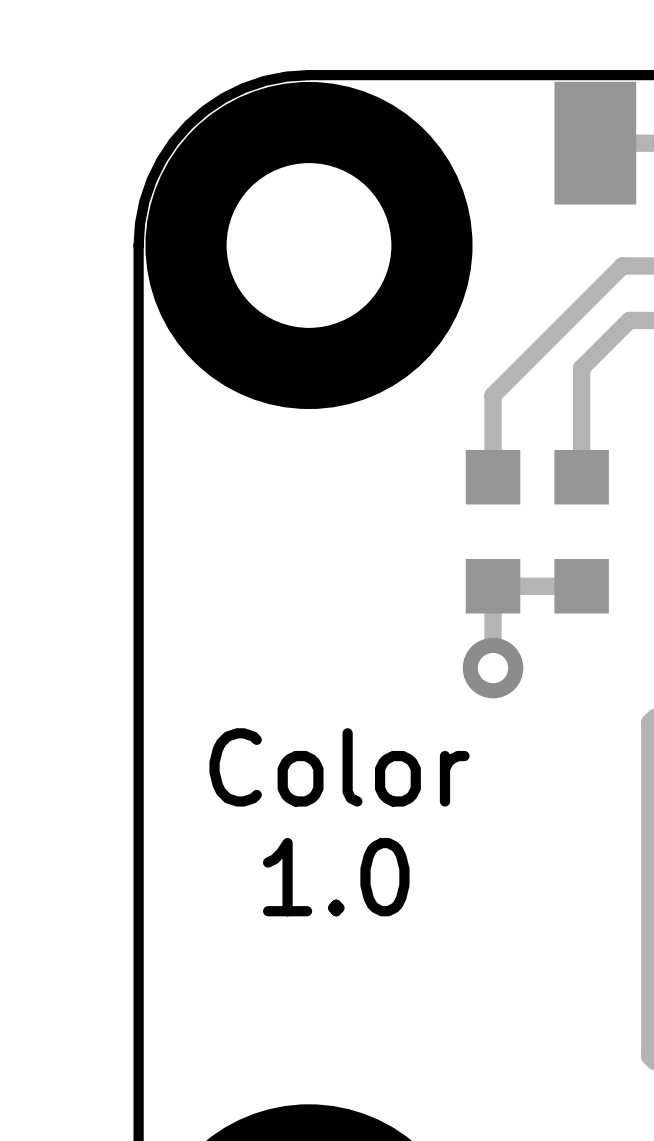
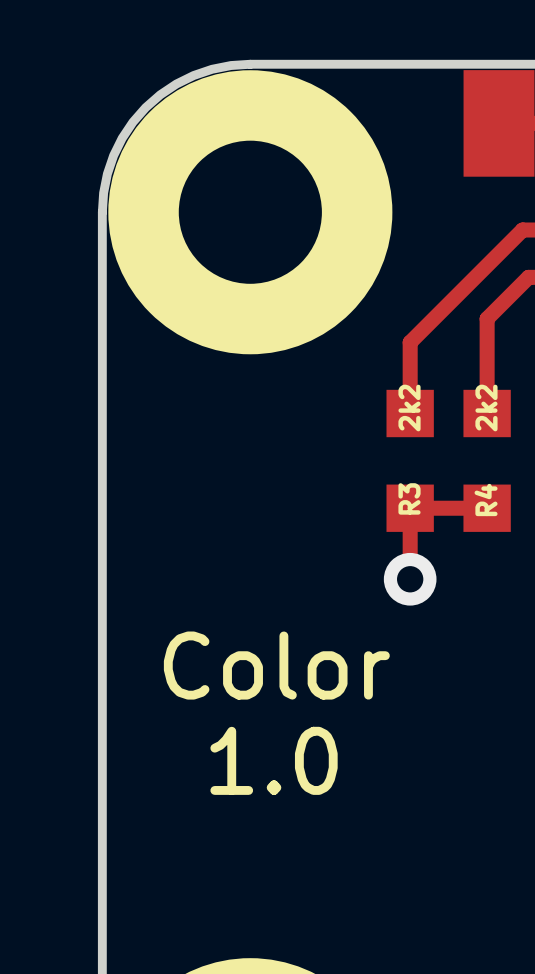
R3 value: none -> 2k2 (409, 408)
R4 value: none -> 2k2 (486, 408)
R3 name: none -> R3 (409, 498)
R4 name: none -> R4 (486, 499)

